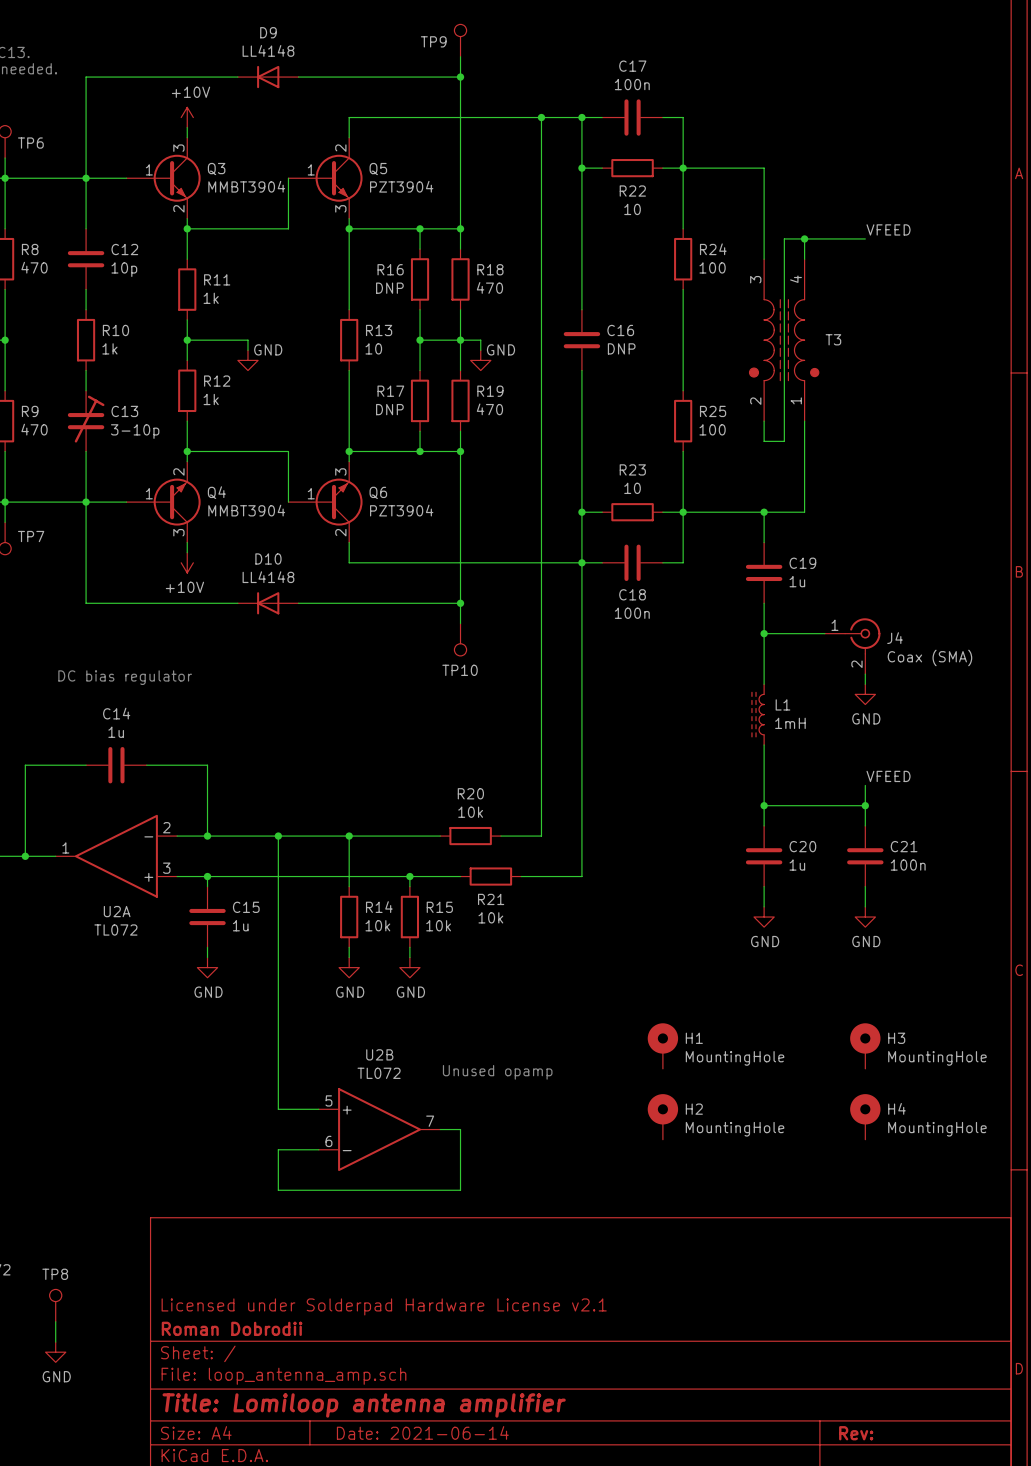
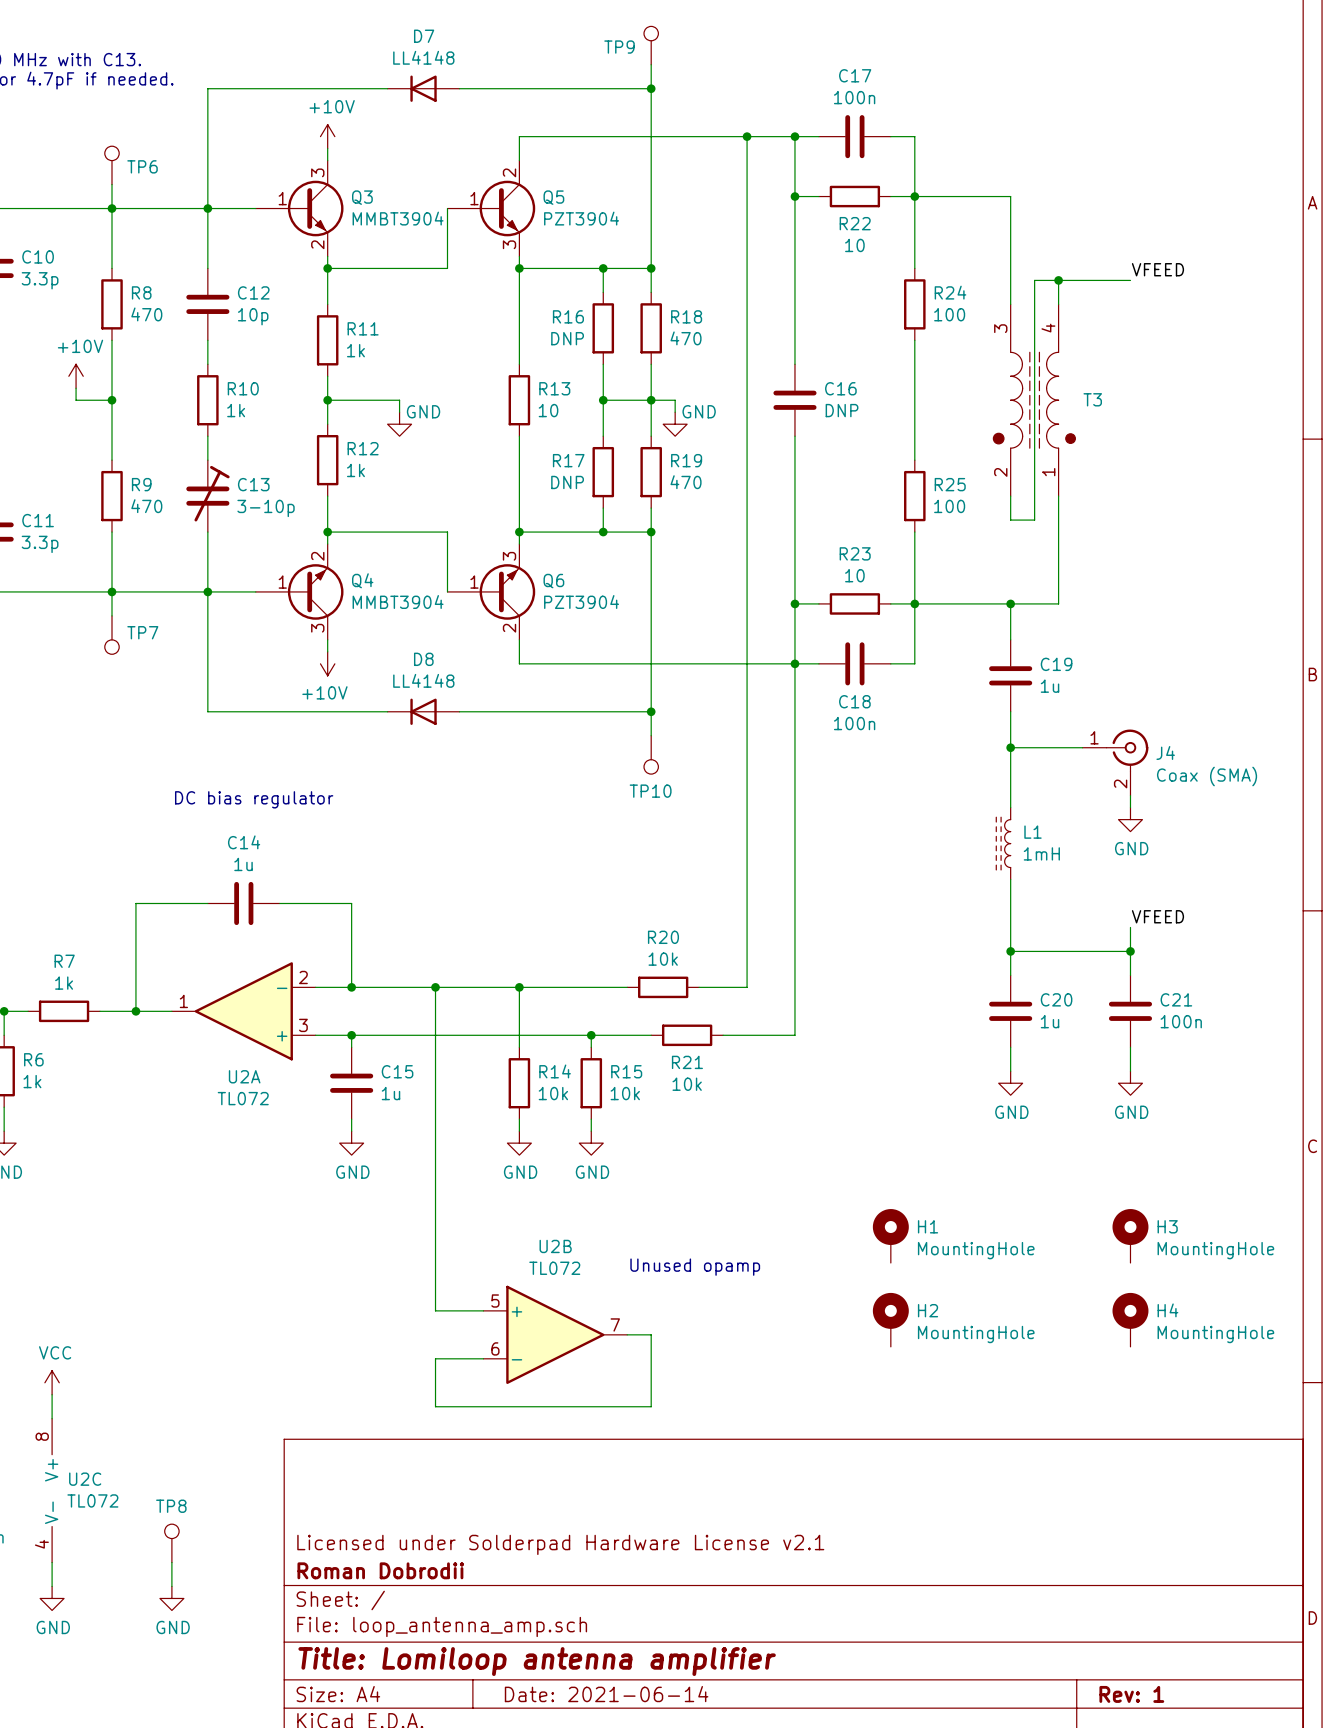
D9 name: D9 (268, 32) -> D7 (424, 36)
D10 name: D10 (268, 558) -> D8 (423, 659)
title block: Rev: (856, 1433) -> Rev: 1 (1131, 1694)

